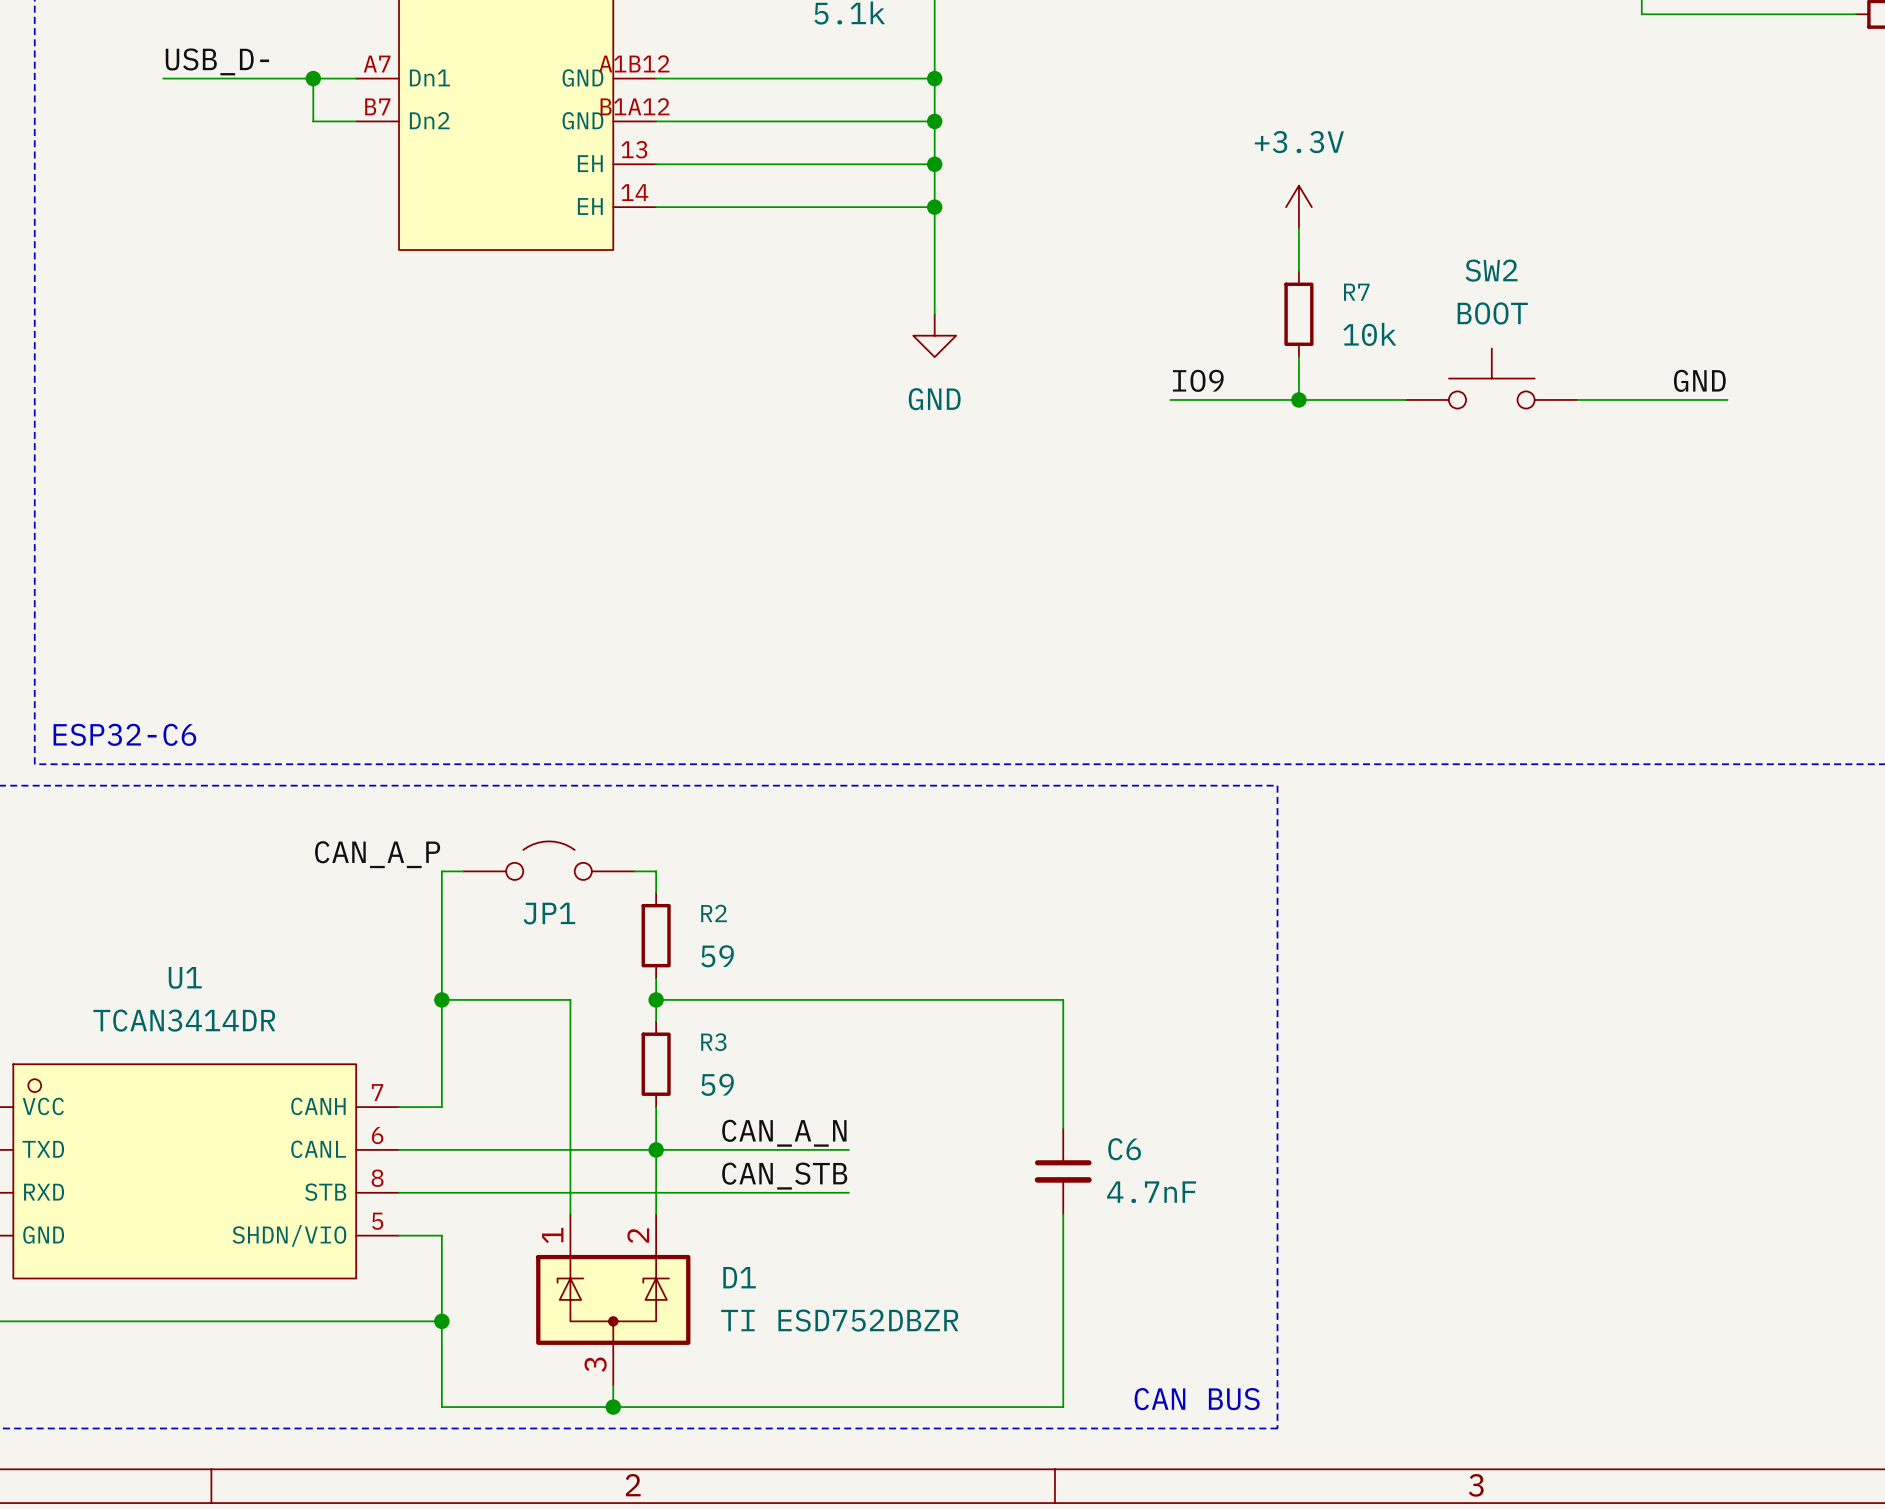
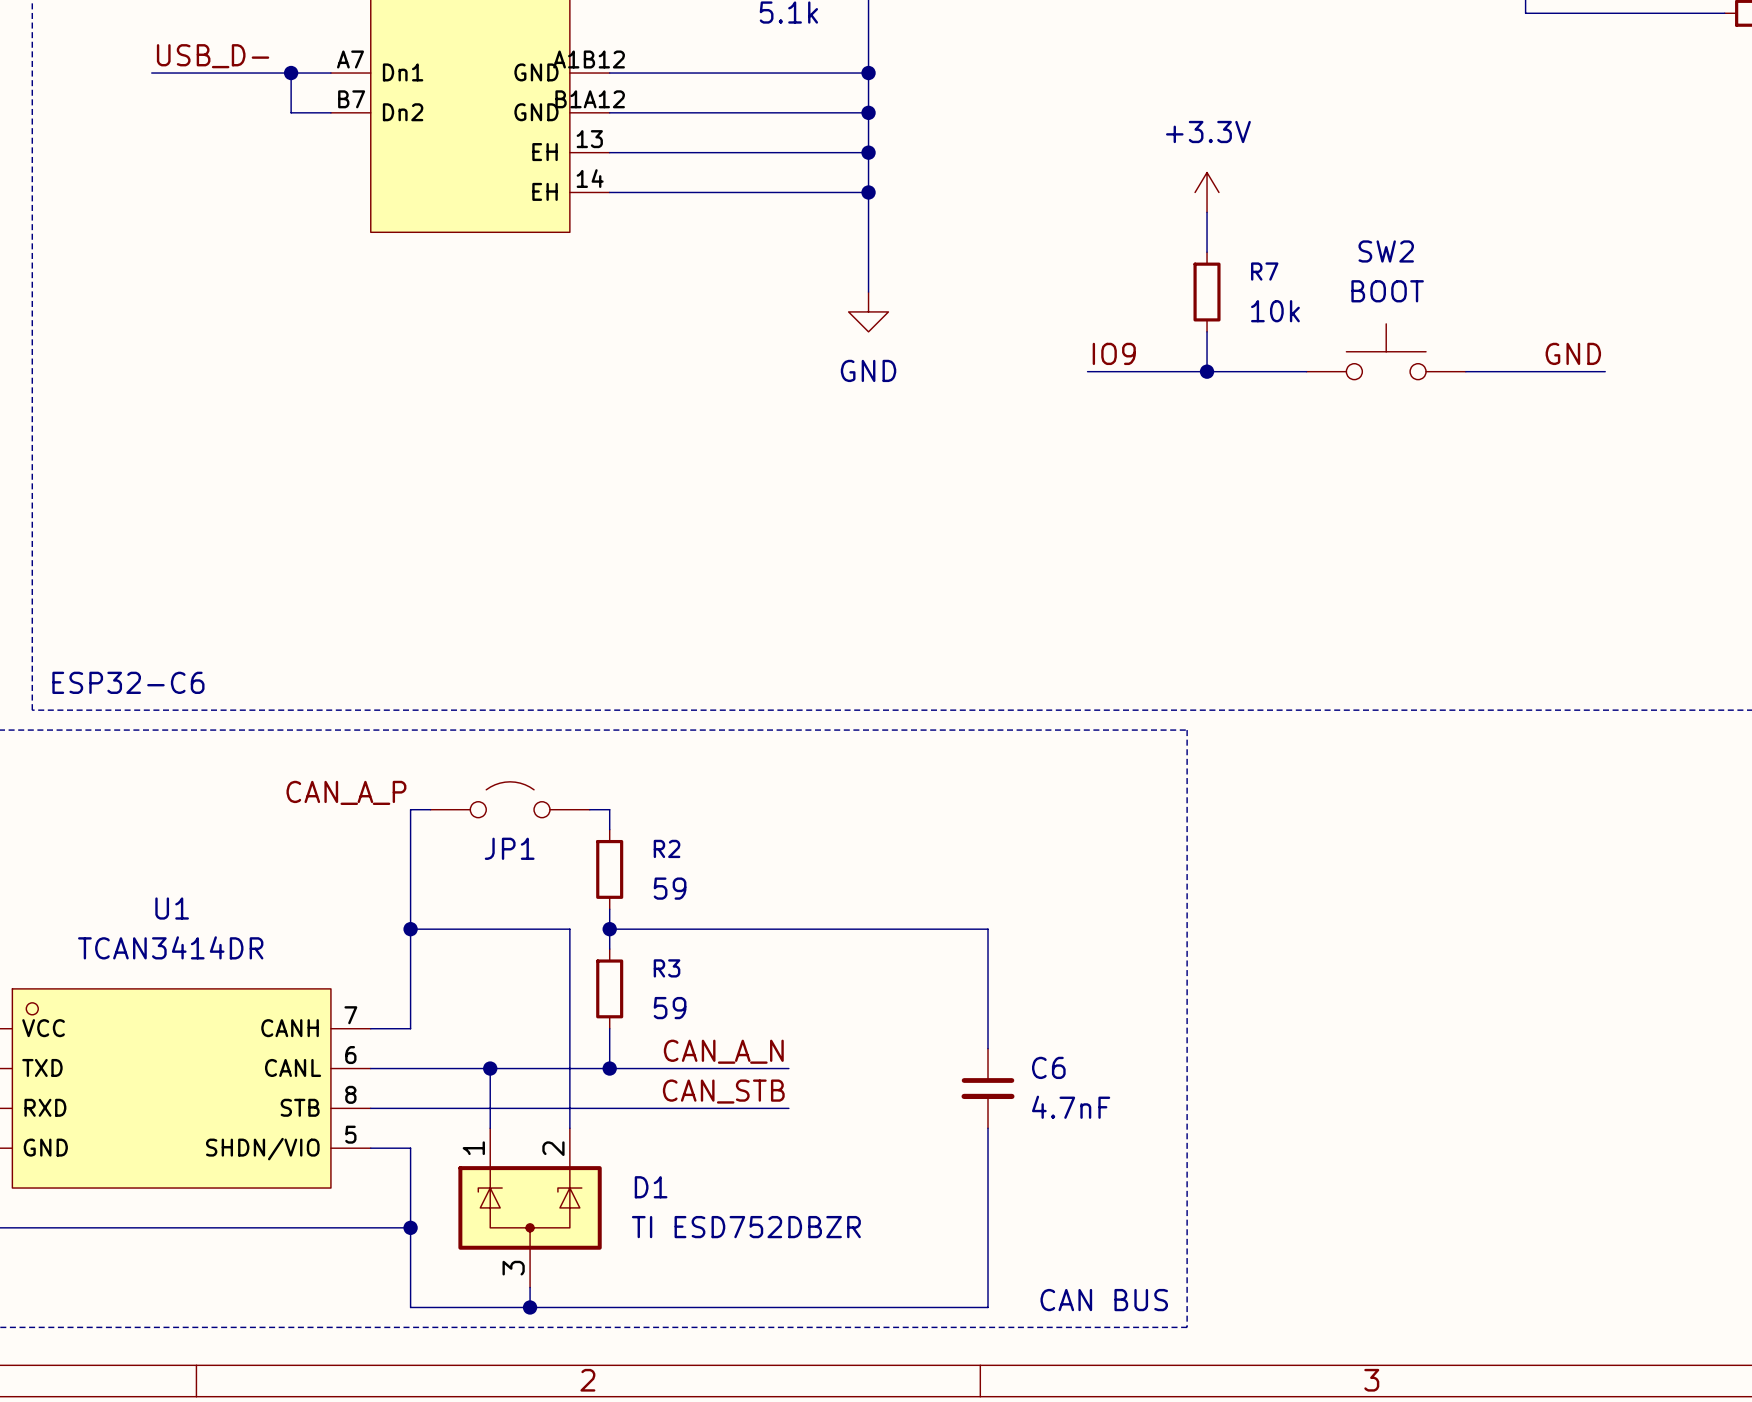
wire: (570, 999) (570, 1214) -> (530, 929) (569, 929) (569, 1128)
junction: none -> (490, 1068)
wire: (656, 1149) (656, 1214) -> (490, 1068) (490, 1128)
D1 position: (613, 1299) -> (530, 1207)
wire: (613, 1385) (613, 1407) -> (530, 1287) (530, 1307)
junction position: (613, 1407) -> (530, 1307)

